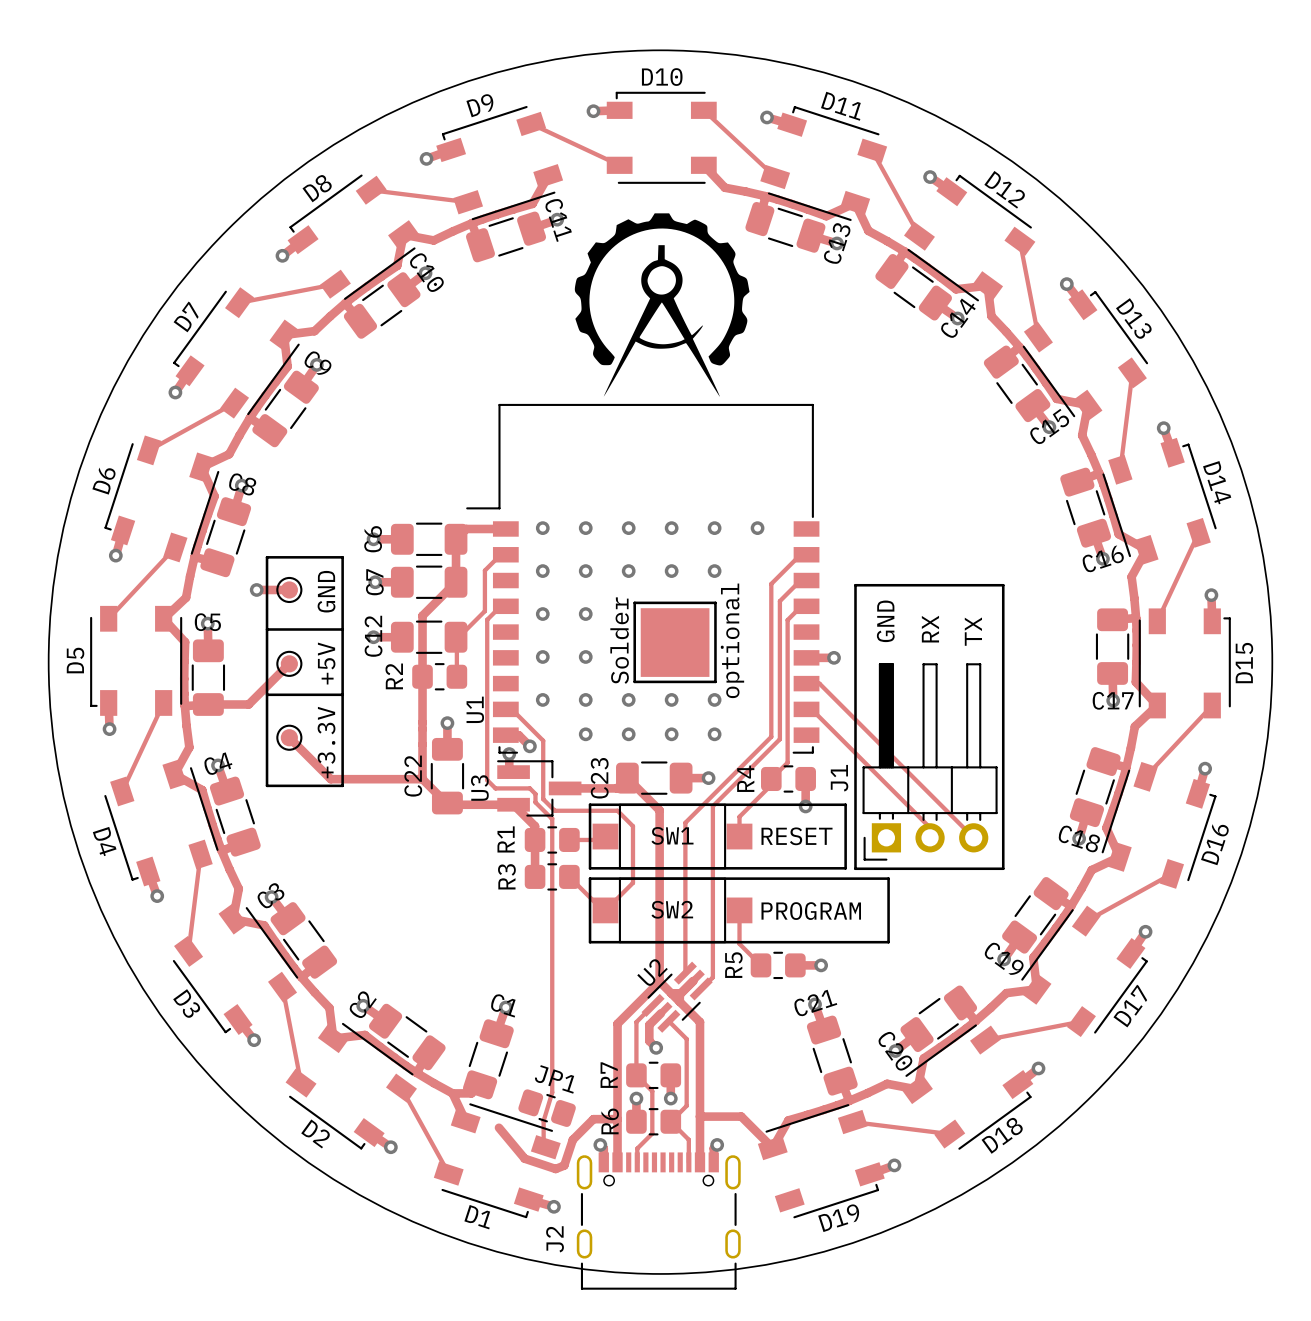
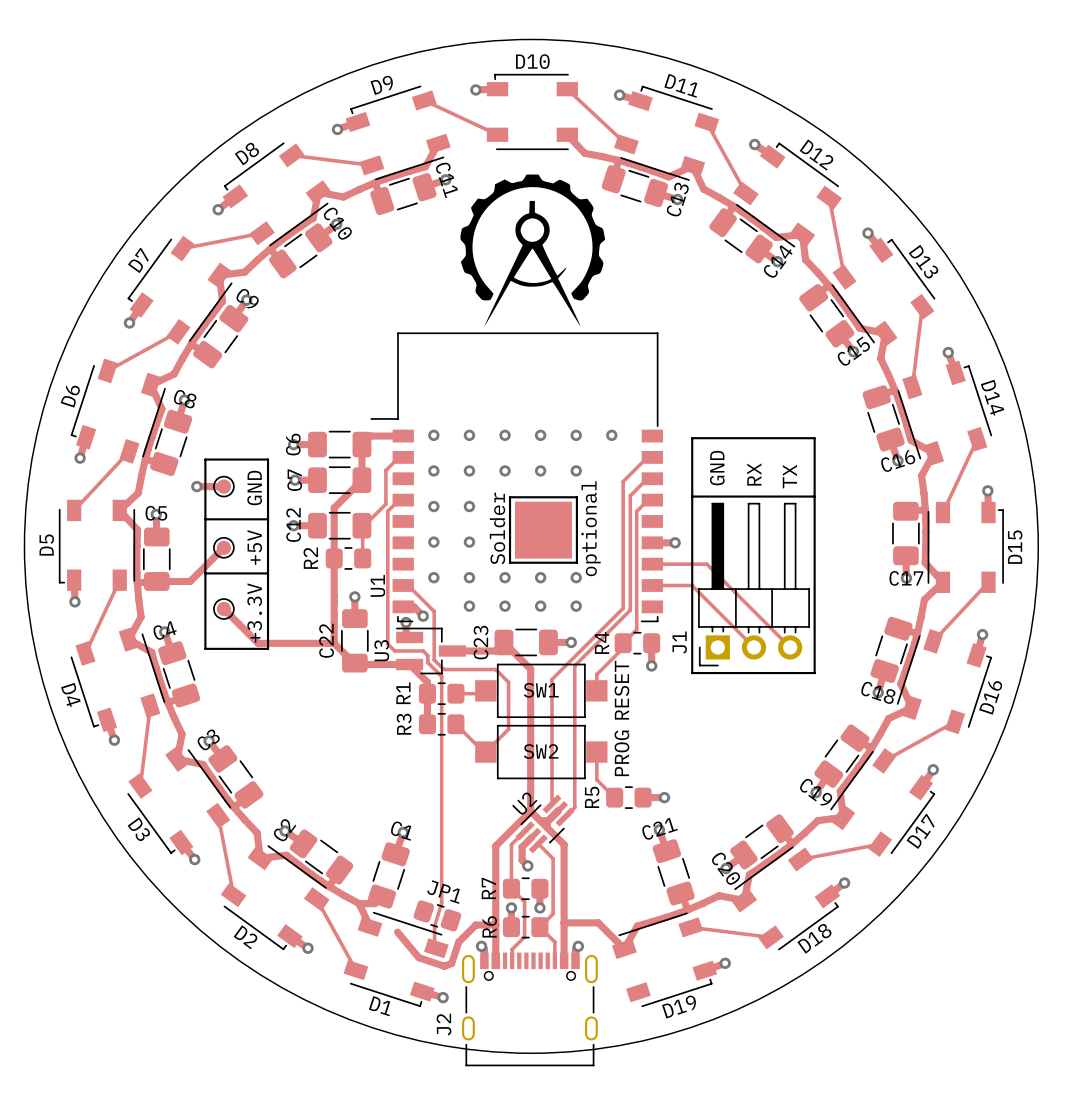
line: (855, 585) (1003, 585) (1003, 868) (855, 868) (855, 585) -> (692, 438) (692, 673) (814, 673) (814, 438) (692, 438)
line: none -> (692, 496) (814, 496)
text position: GND (885, 621) -> GND (717, 468)
text position: RX (930, 629) -> RX (754, 474)
text position: TX (973, 631) -> TX (789, 476)
track: (819, 683) (973, 837) -> (663, 564) (706, 564) (790, 647)
track: (811, 709) (930, 827) (930, 837) -> (656, 585) (692, 585) (754, 647)
J1 position: (930, 761) -> (754, 584)
line: (590, 804) (845, 804) (845, 868) (590, 868) (590, 804) -> none
text rotation: 0° (797, 836) -> 90° counterclockwise (621, 690)
line: (590, 878) (590, 942) (888, 942) (888, 878) (590, 878) -> none
text: PROGRAM (811, 911) -> PROG (621, 753)

